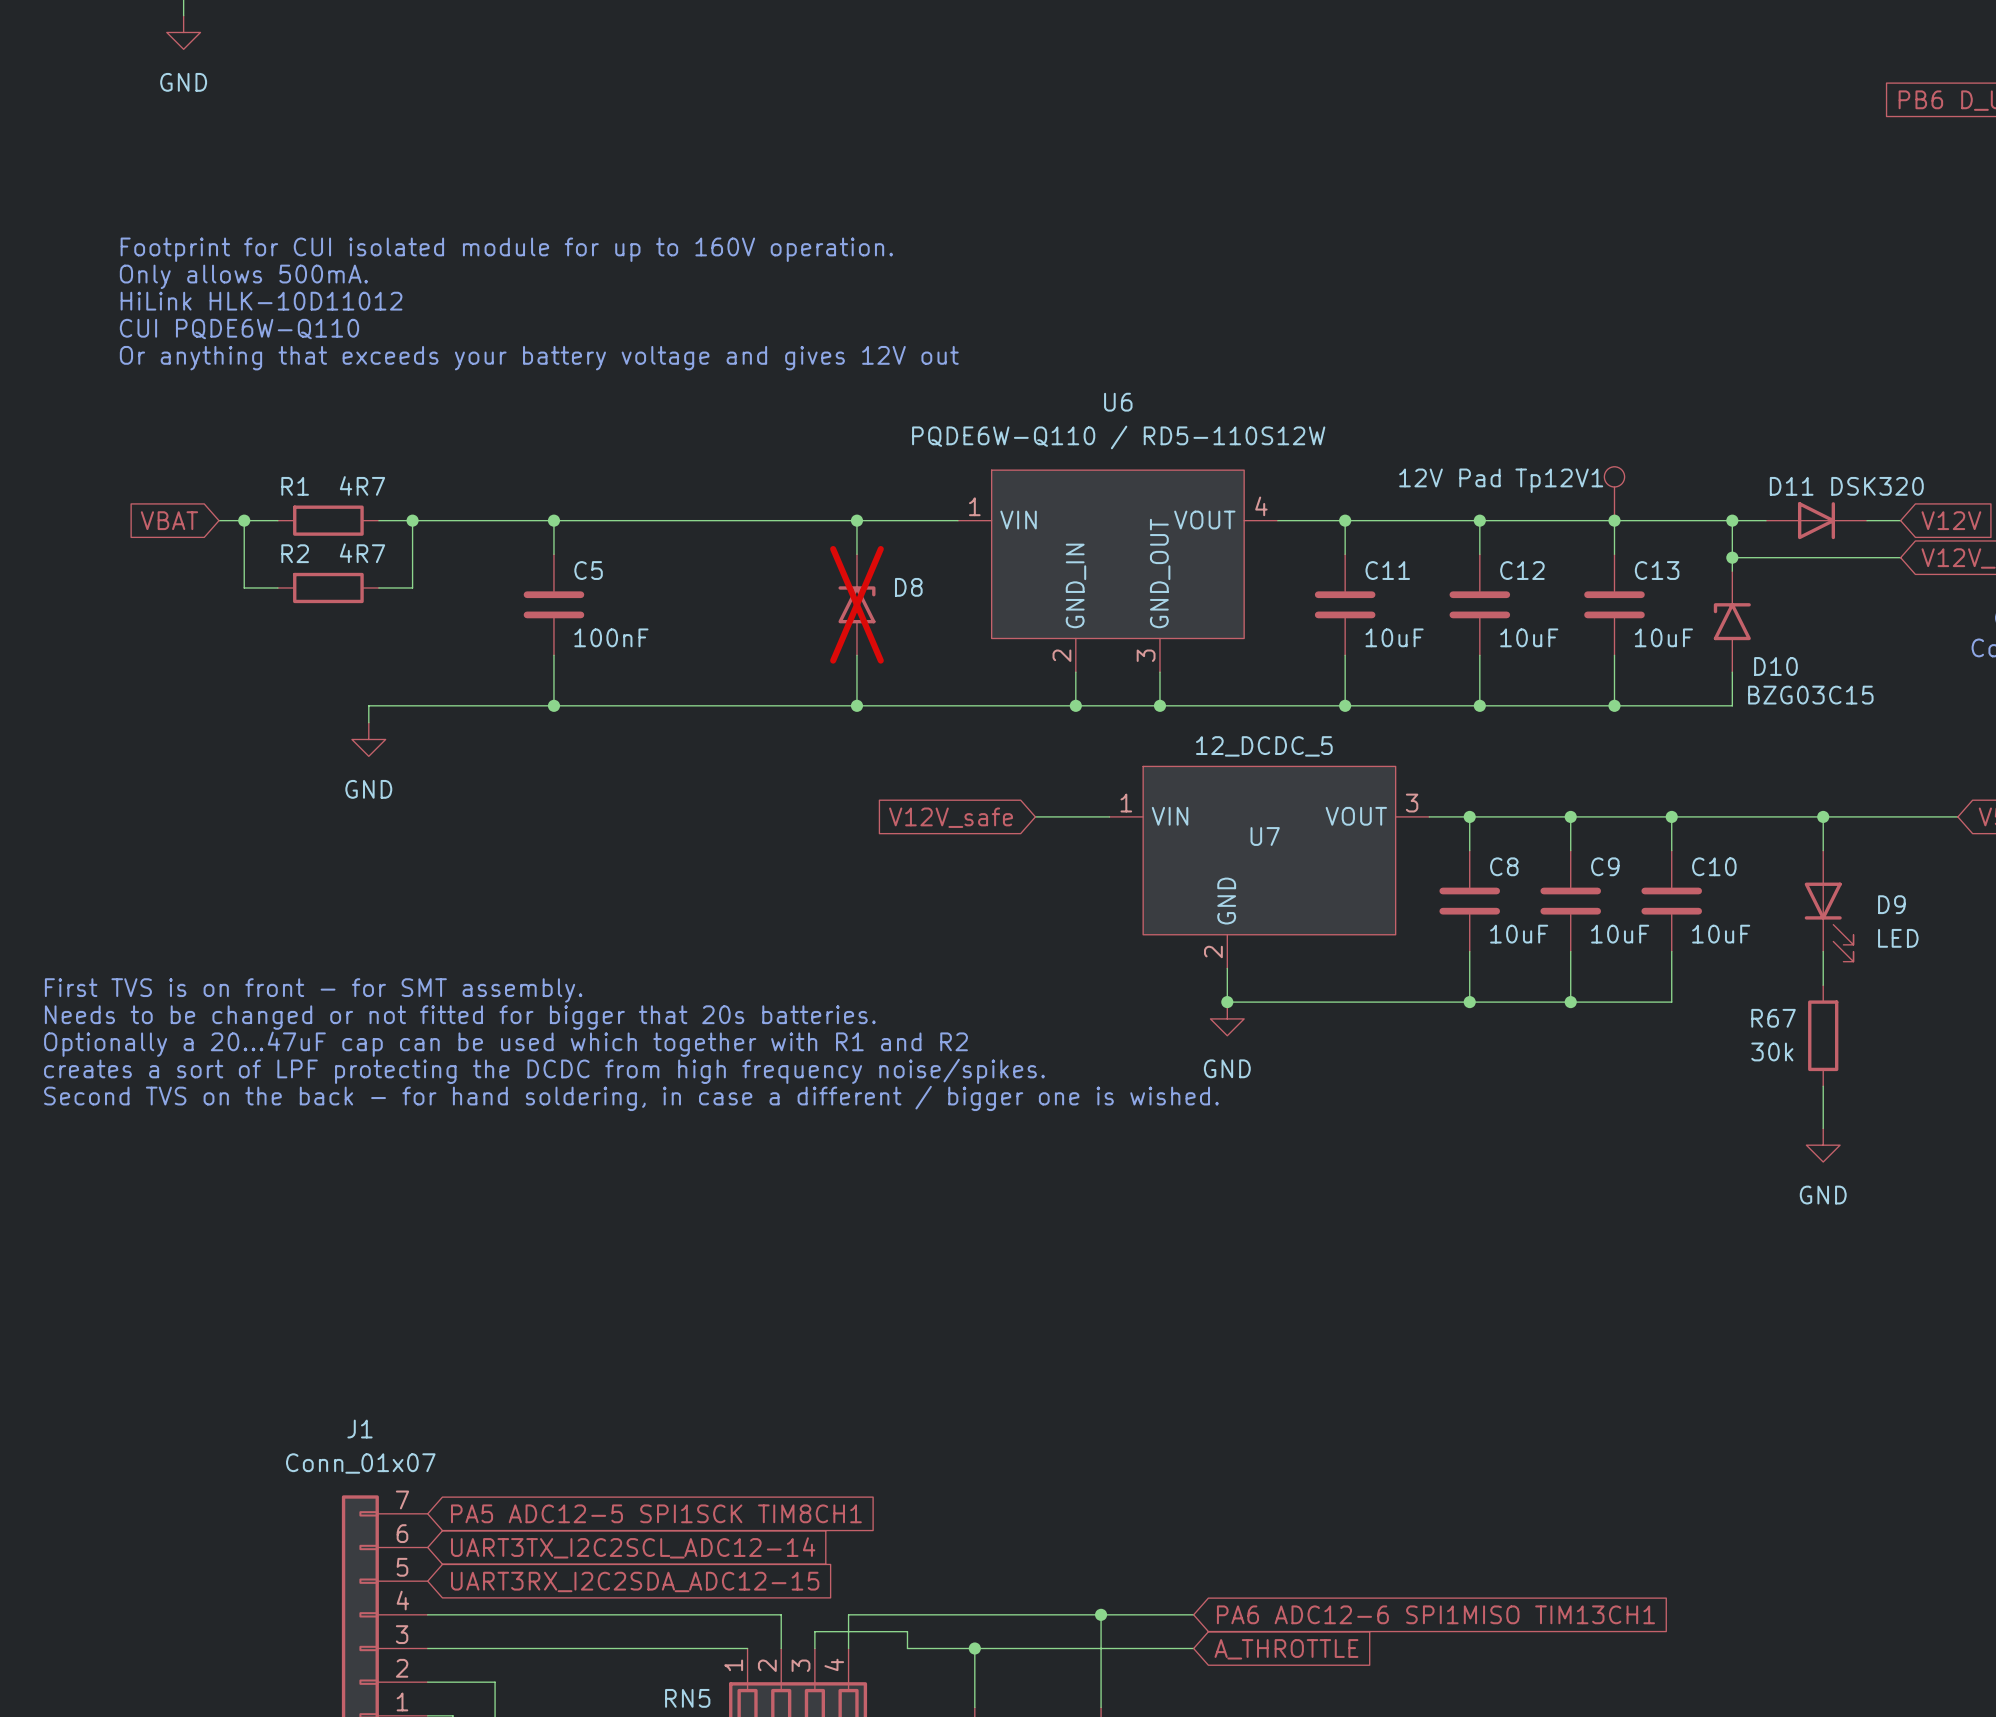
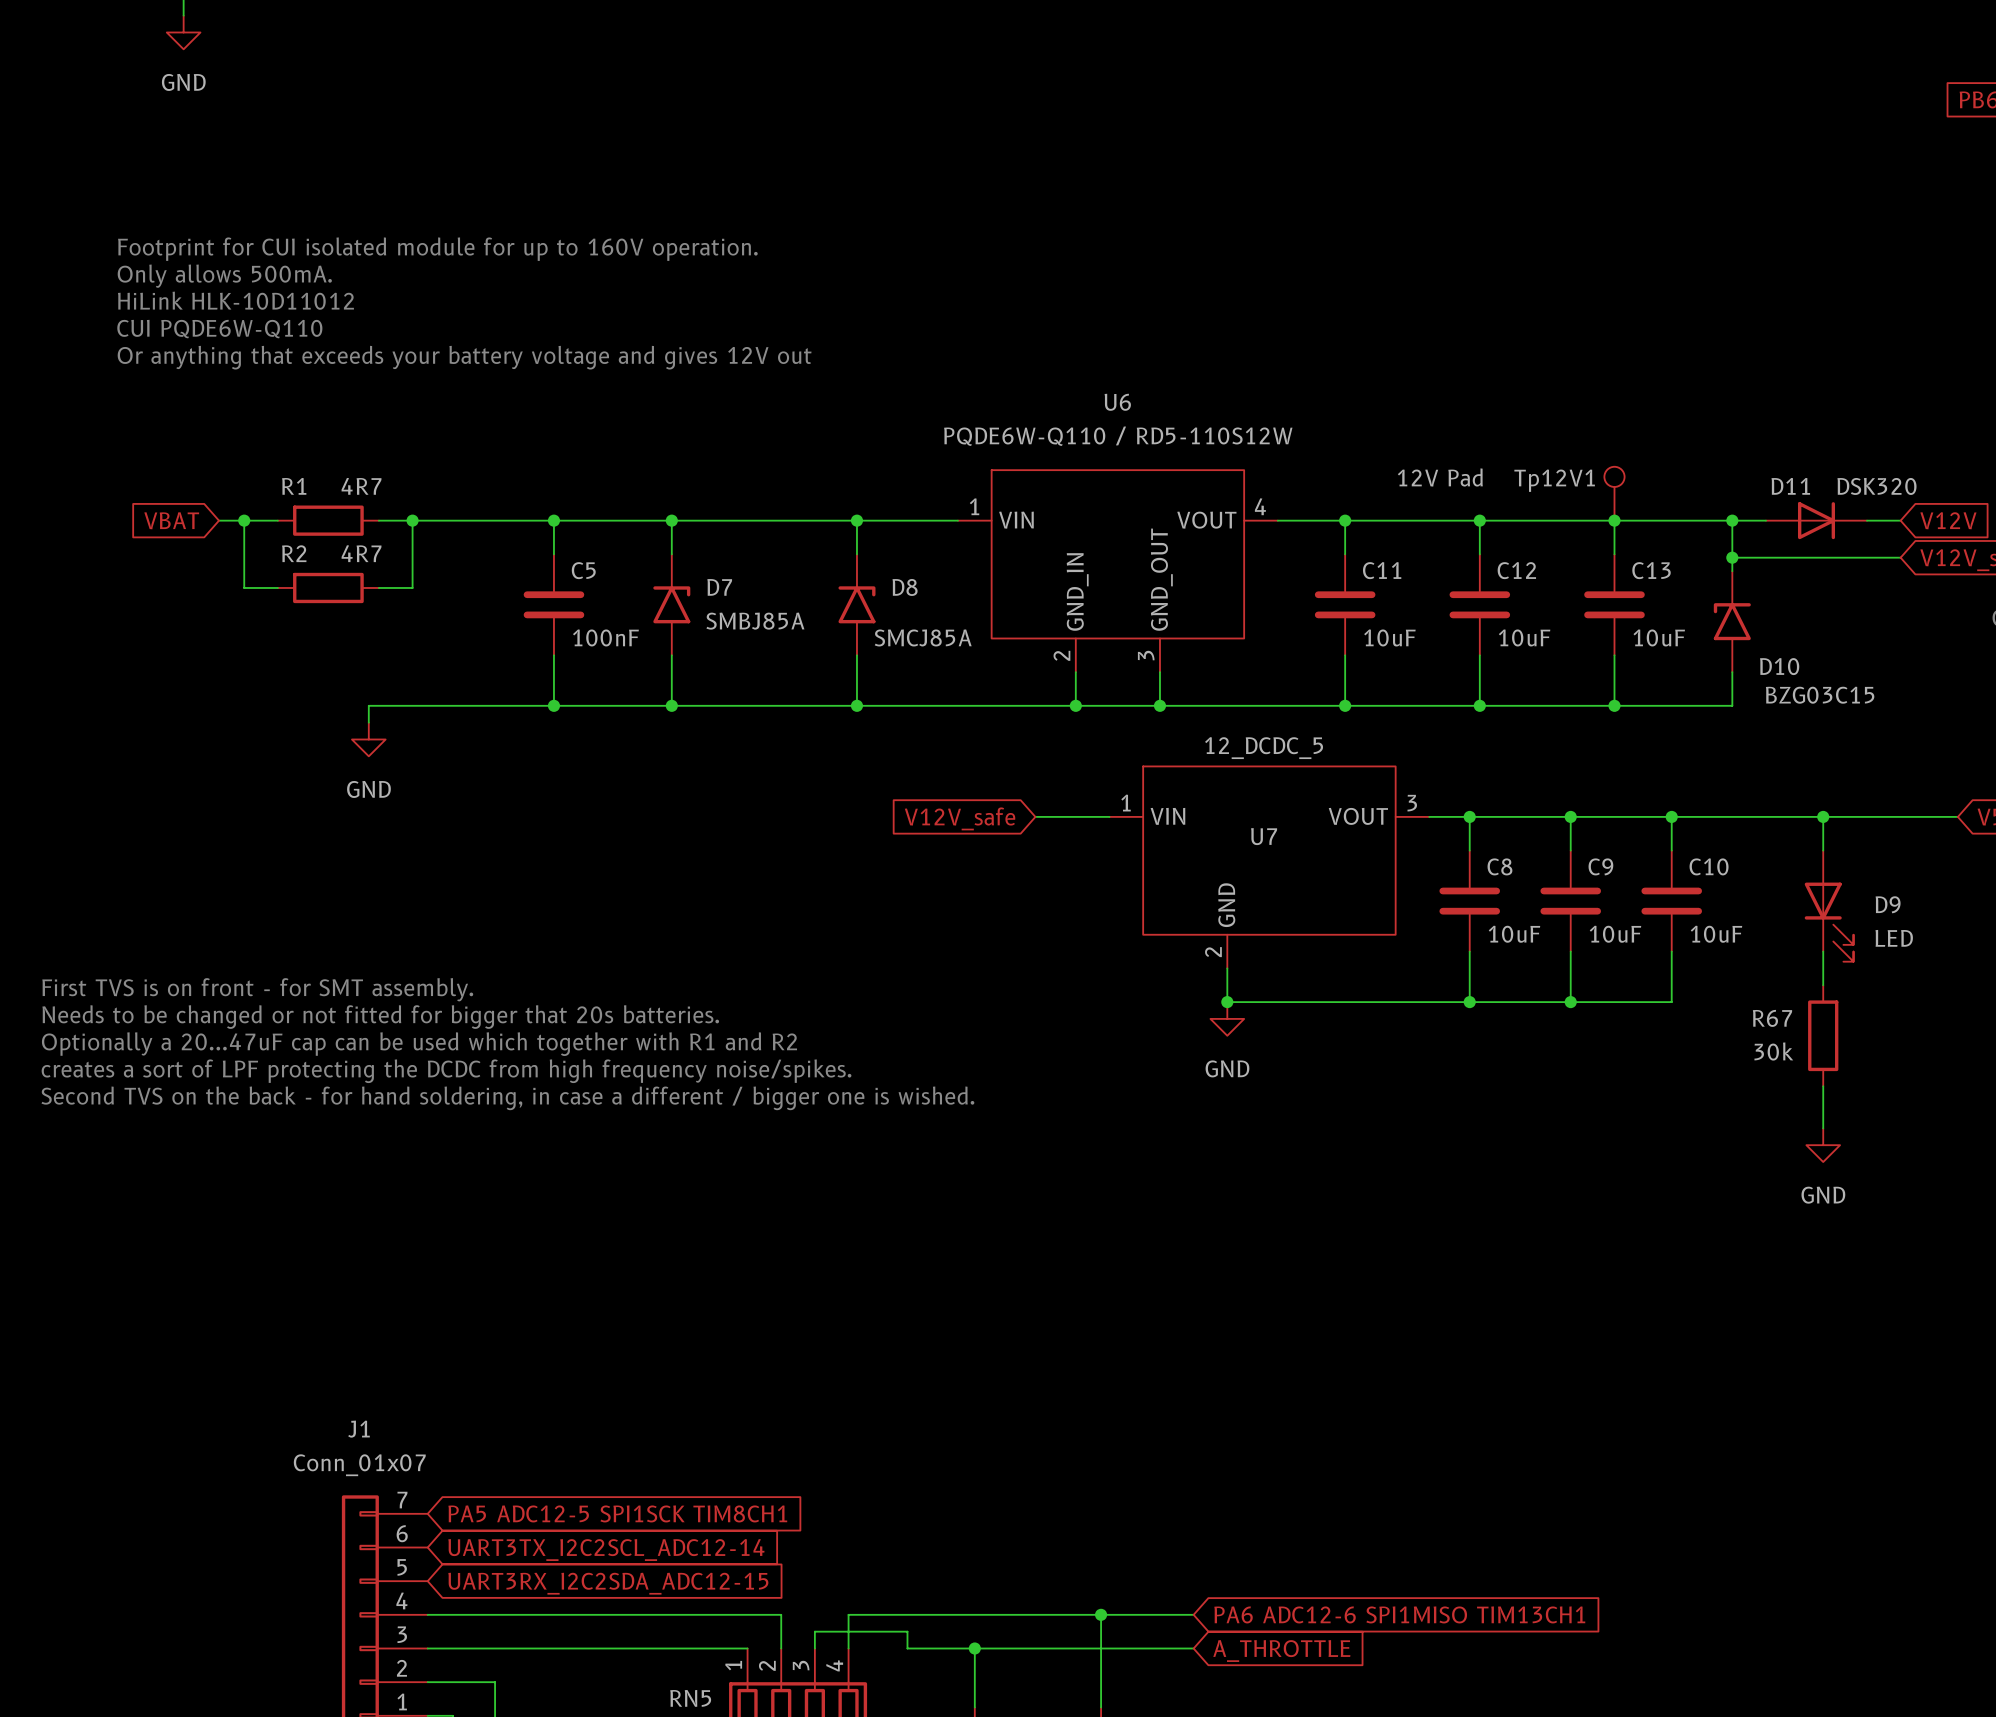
wire: none -> (671, 520) (671, 554)
junction: none -> (671, 520)
D7: none -> SMBJ85A (671, 604)
D8 do-not-place cross: (856, 604) -> none
D8 value: none -> SMCJ85A (923, 637)
wire: none -> (671, 655) (671, 705)
junction: none -> (671, 705)

